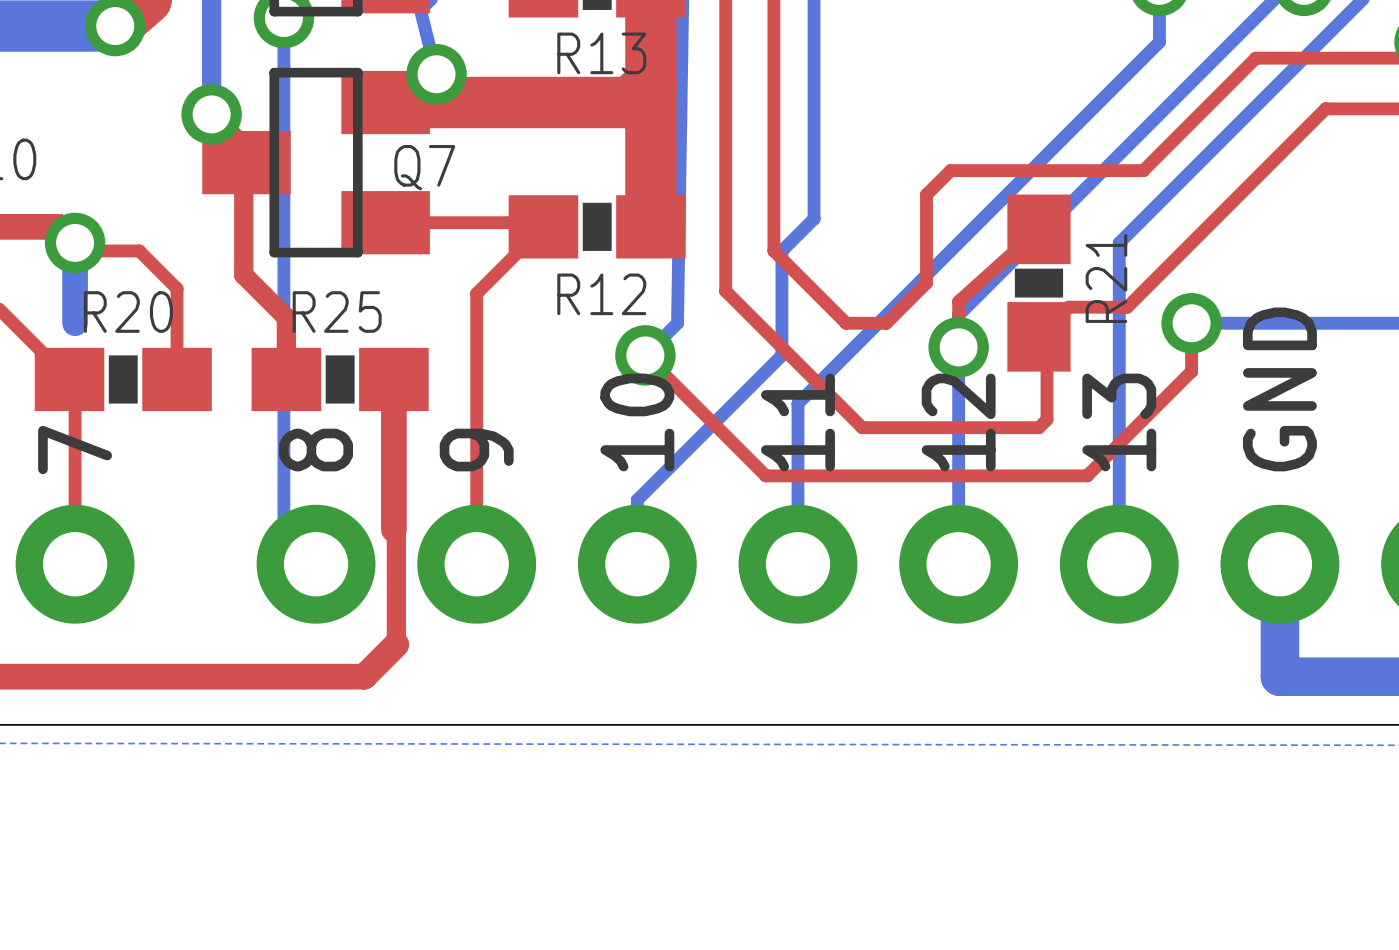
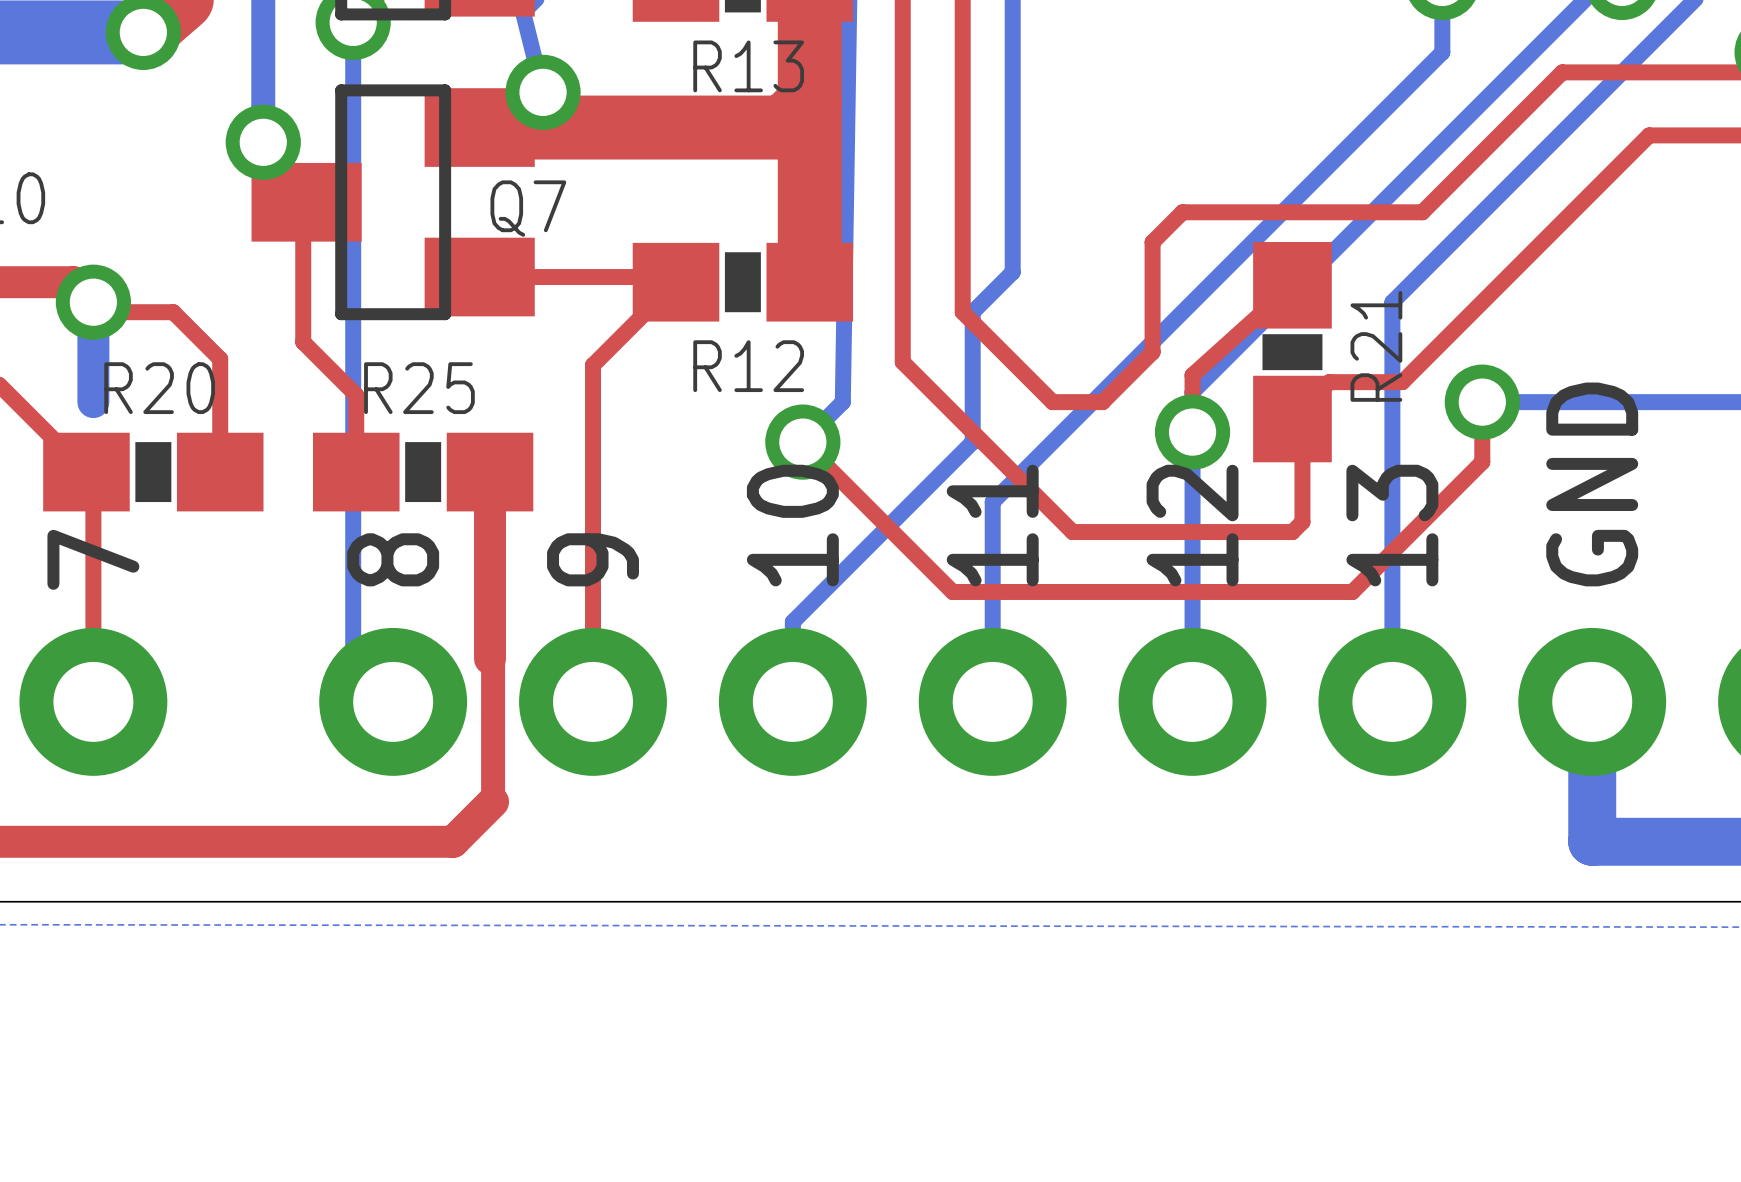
top track width: thick (243, 165) (243, 275) (286, 317) (286, 379) -> thin (303, 205) (303, 342) (356, 395) (356, 472)

